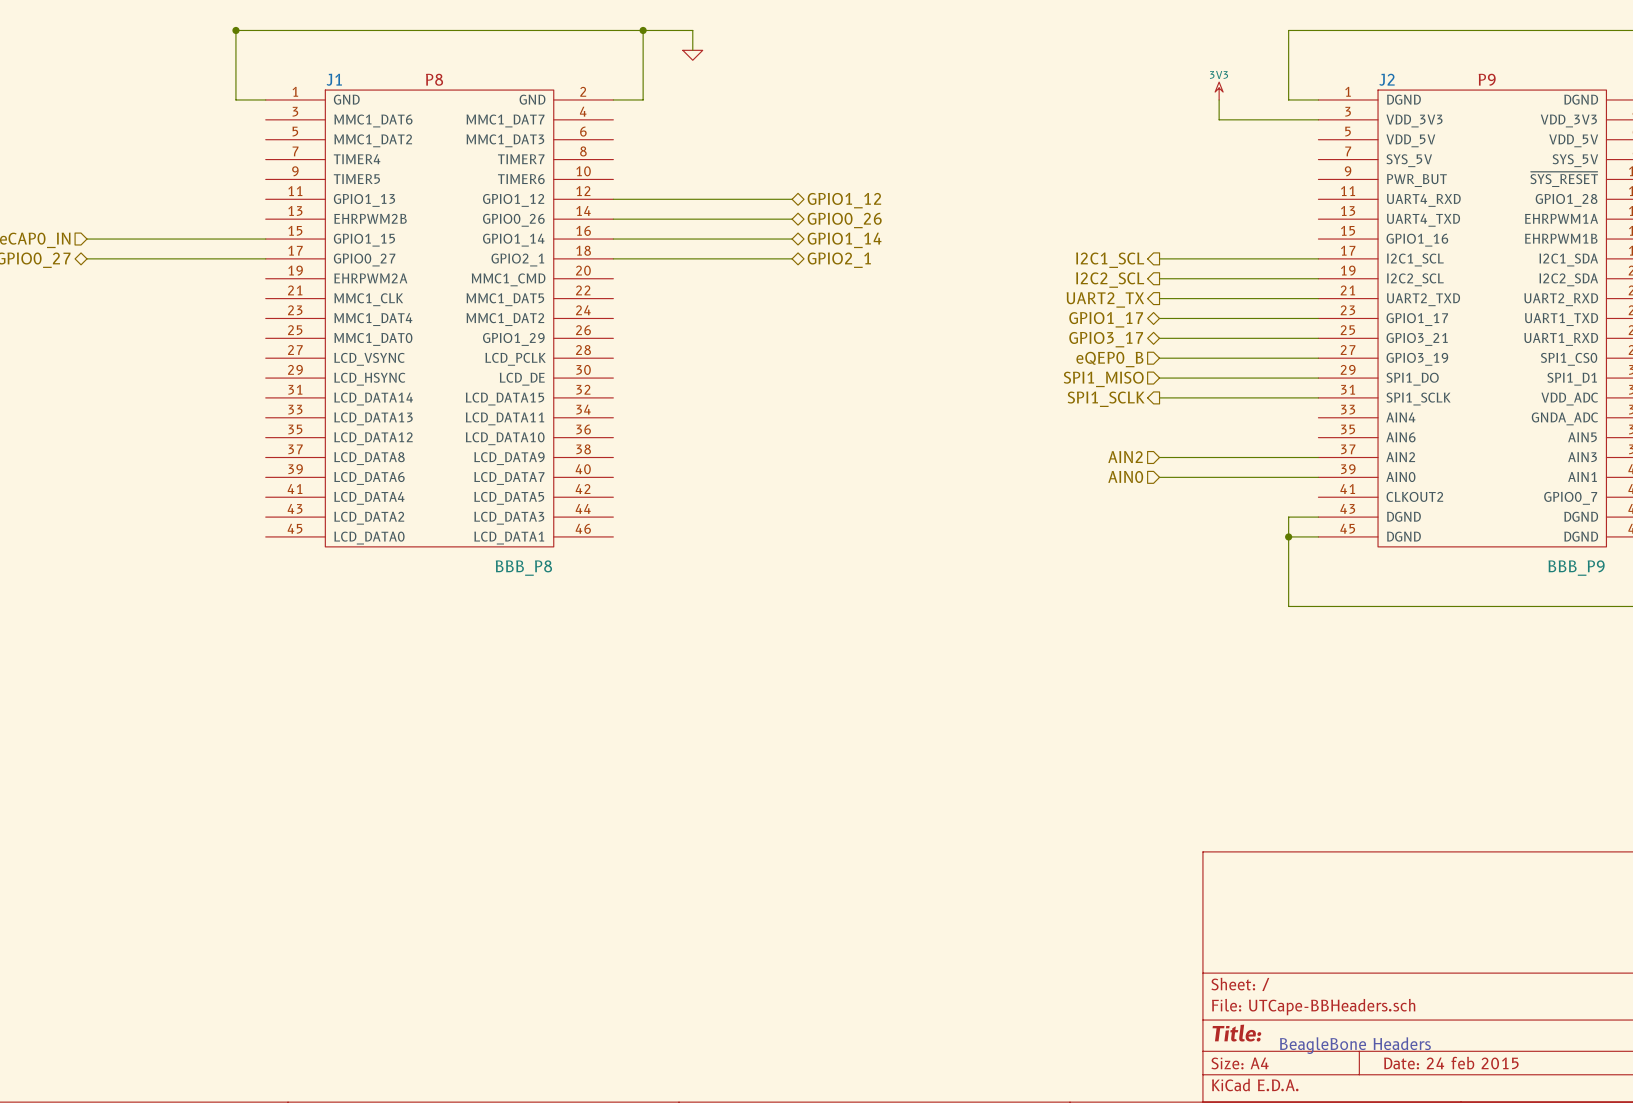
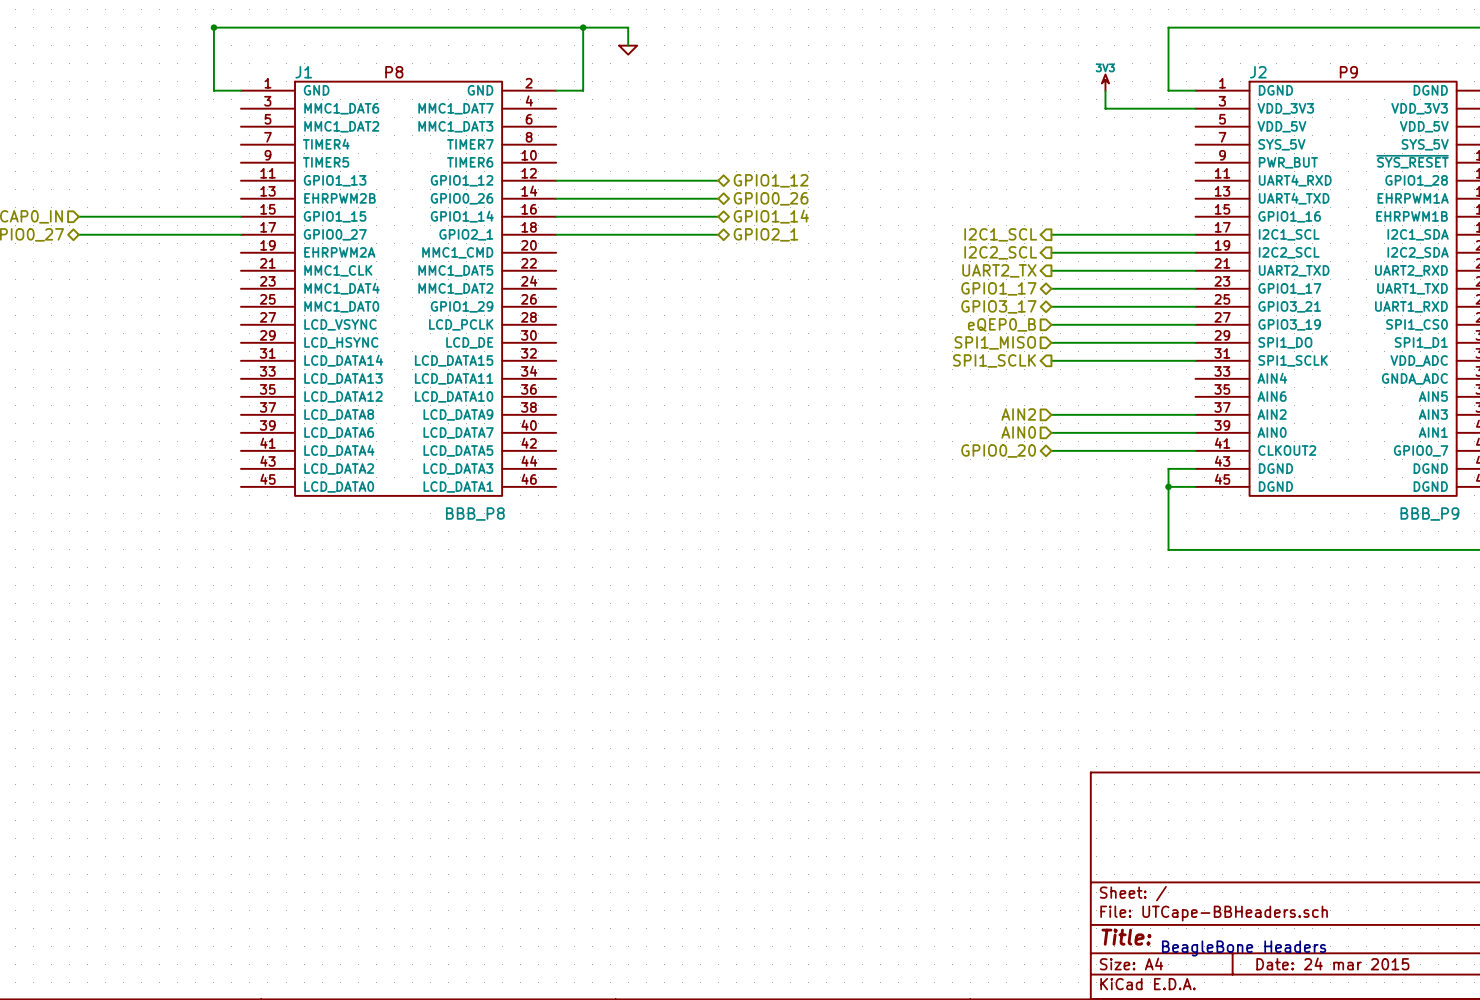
wire: none -> (1051, 450) (1195, 450)
hierarchical label: none -> GPIO0_20 (998, 450)
title block: Date: 24 feb 2015 (1451, 1063) -> Date: 24 mar 2015 (1332, 963)

